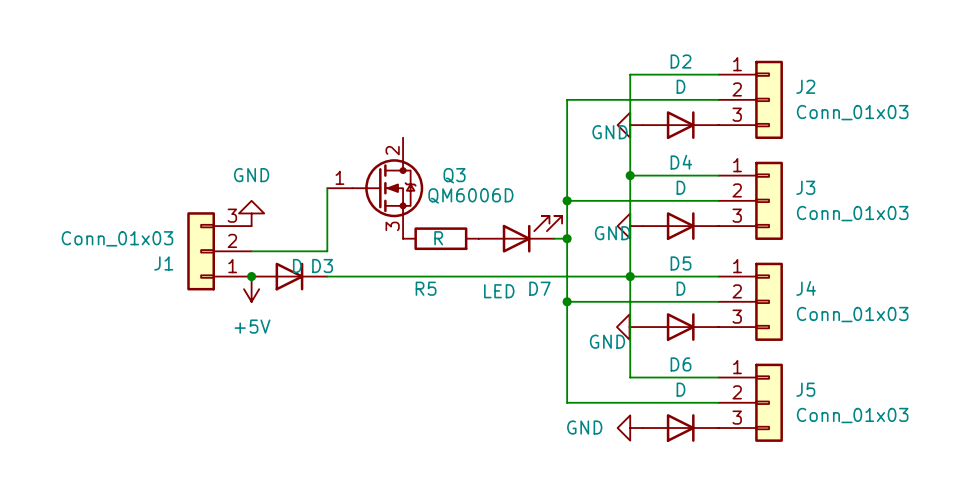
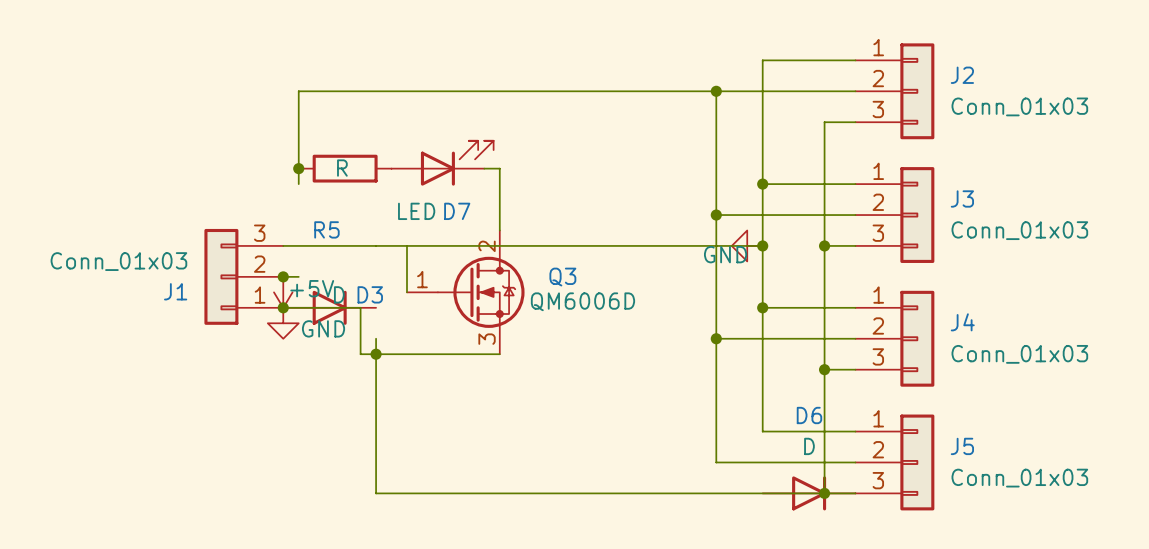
wire: (642, 74) (630, 74) (630, 377) (642, 377) -> (762, 60) (762, 431)
wire: (567, 99) (567, 402) (604, 402) -> (716, 91) (716, 462)
wire: none -> (669, 91) (298, 91) (298, 184)
junction: none -> (716, 91)
power symbol: GND (630, 125) -> none
D2: D (680, 125) -> none
wire: none -> (855, 122) (824, 122) (824, 493)
junction: none -> (298, 168)
wire: none -> (484, 168) (499, 168) (499, 230)
wire: (630, 175) (642, 175) -> none
junction position: (630, 175) -> (762, 184)
wire: (327, 188) (327, 251) (264, 251) -> none
Q3 position: (375, 188) -> (465, 292)
wire: (567, 200) (604, 200) -> none
junction: (567, 200) -> none
junction: none -> (716, 215)
power symbol: GND (251, 213) -> none
wire: none -> (283, 245) (762, 245)
wire: none -> (406, 245) (406, 292)
junction: none -> (762, 245)
D4: D (680, 226) -> none
junction: none -> (824, 245)
D7 position: (520, 234) -> (442, 163)
R5 position: (440, 238) -> (345, 168)
wire: (554, 238) (567, 238) -> none
junction: (567, 238) -> none
junction: none -> (283, 276)
power symbol: none -> +5V (283, 292)
wire: none -> (283, 307) (360, 307) (360, 354) (499, 354)
wire: (327, 276) (642, 276) -> none
junction position: (630, 276) -> (762, 307)
D7 name position: D7 (539, 288) -> D7 (457, 211)
power symbol: +5V (251, 289) -> GND (283, 323)
D7 value position: LED (499, 291) -> LED (416, 211)
wire: none -> (376, 338) (376, 493) (855, 493)
wire: (567, 301) (604, 301) -> none
junction: (567, 301) -> none
junction: none -> (716, 338)
junction: none -> (376, 354)
power symbol: GND (629, 327) -> none
D5: D (680, 327) -> none
junction: none -> (824, 369)
power symbol: GND (630, 428) -> none
junction: none -> (824, 493)

